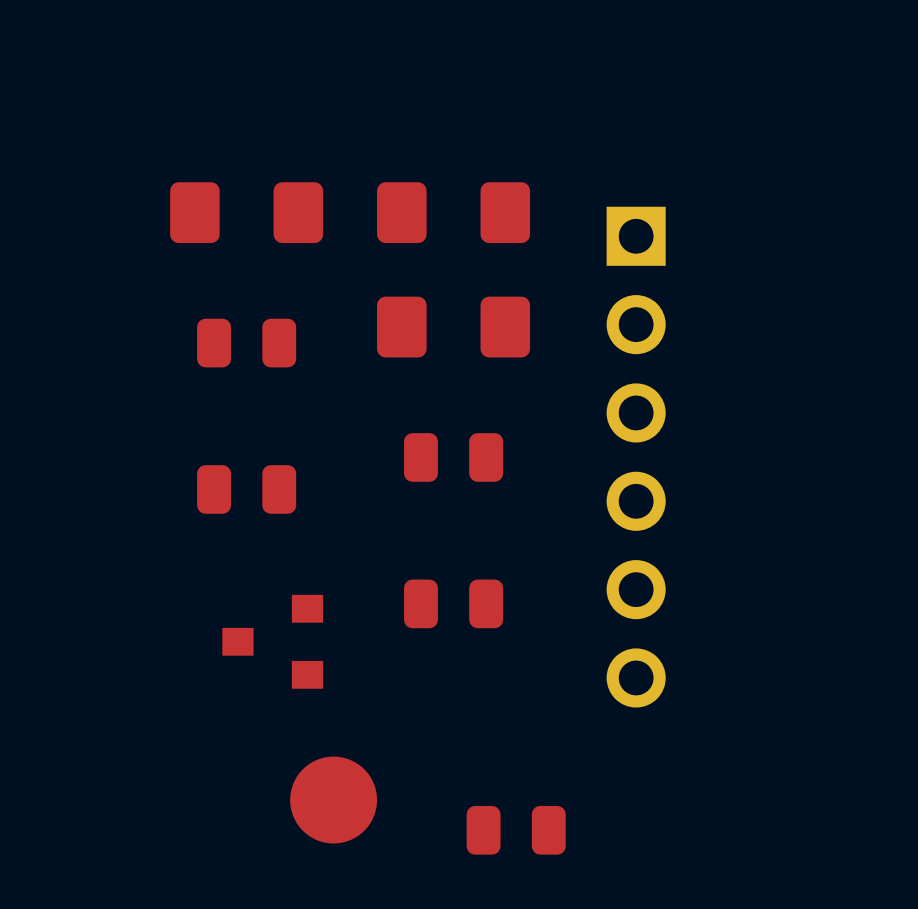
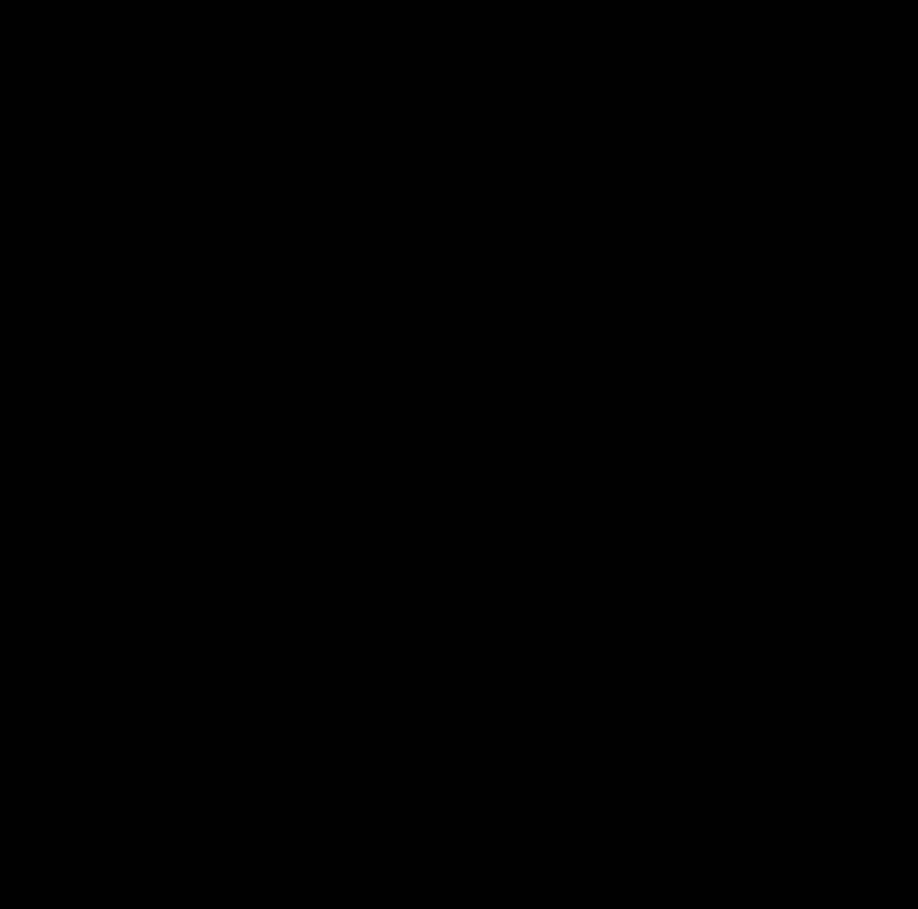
part: (246, 212) -> none
part: (453, 212) -> none
part: (453, 327) -> none
part: (246, 343) -> none
part: (453, 457) -> none
part: (636, 457) -> none
part: (246, 489) -> none
part: (453, 603) -> none
part: (272, 641) -> none
part: (333, 800) -> none
part: (516, 830) -> none

